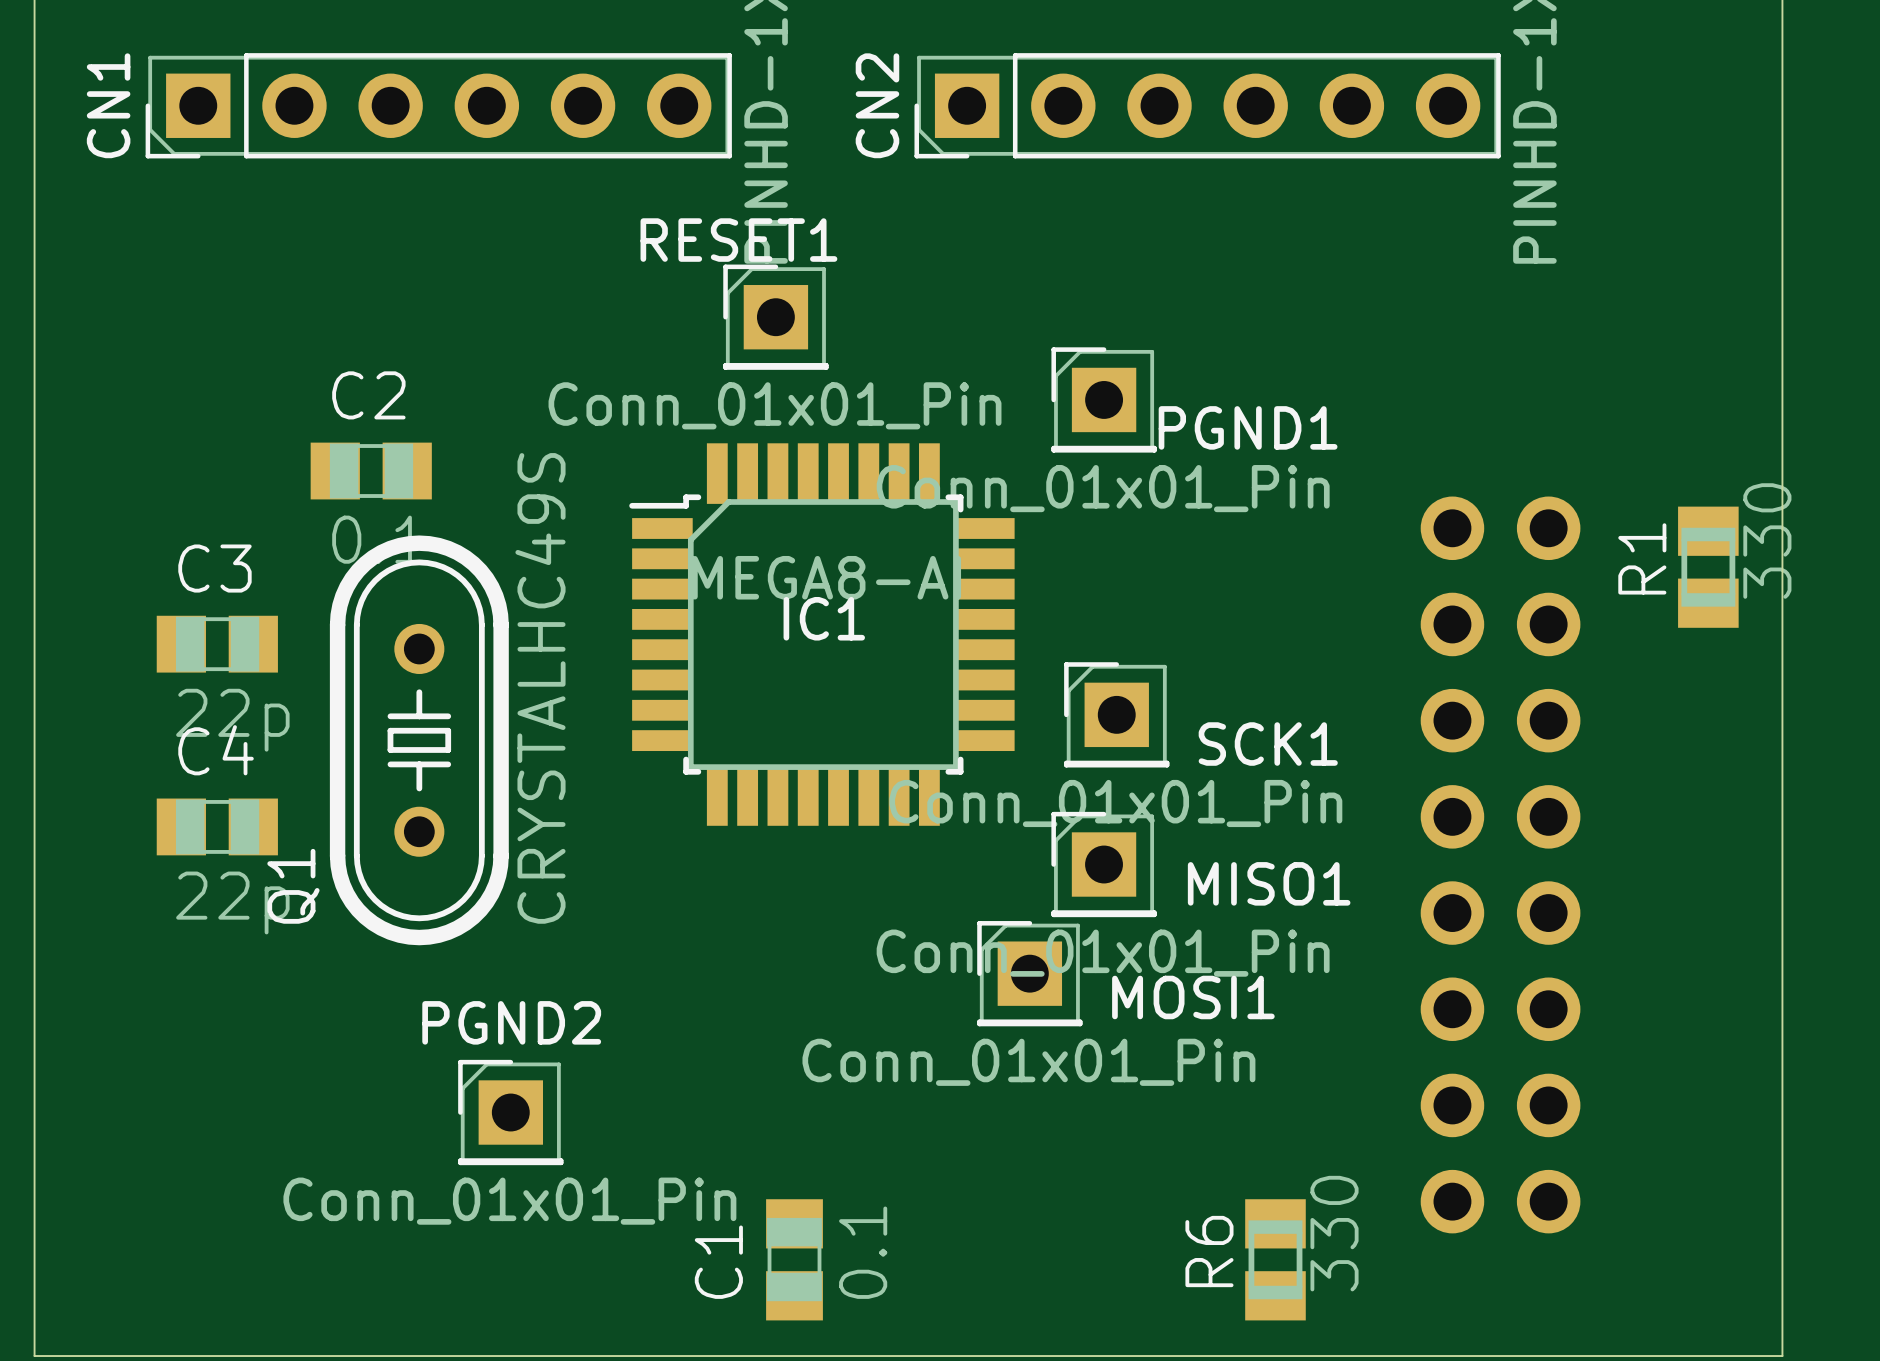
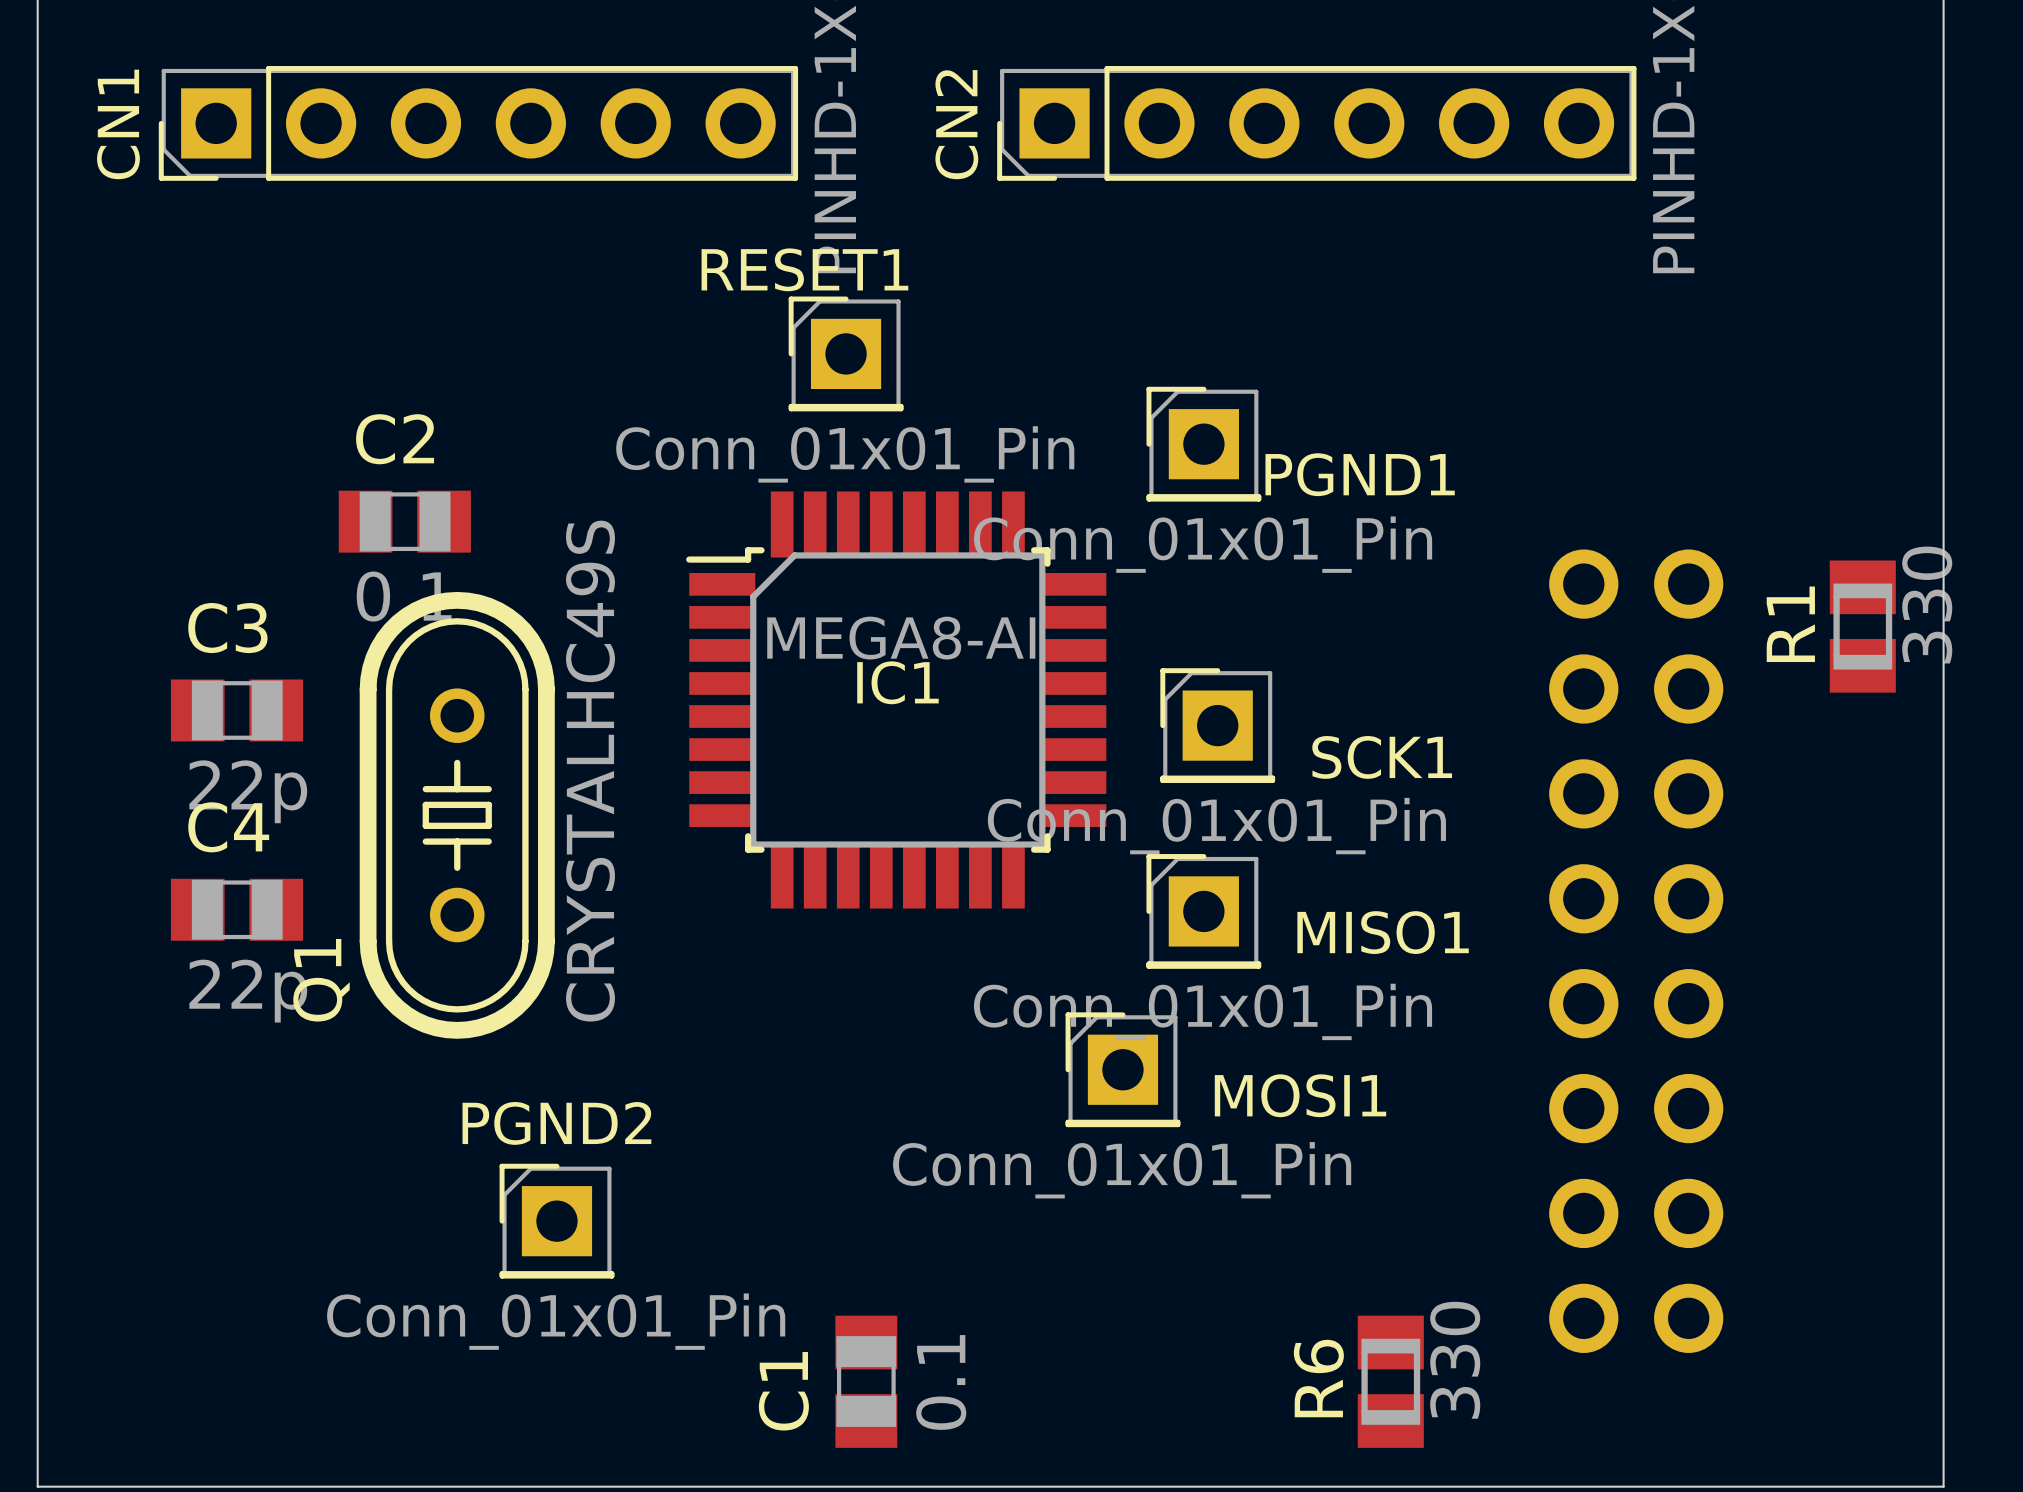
SCK1 position: (1116, 714) -> (1217, 725)
MISO1 position: (1104, 864) -> (1203, 911)

